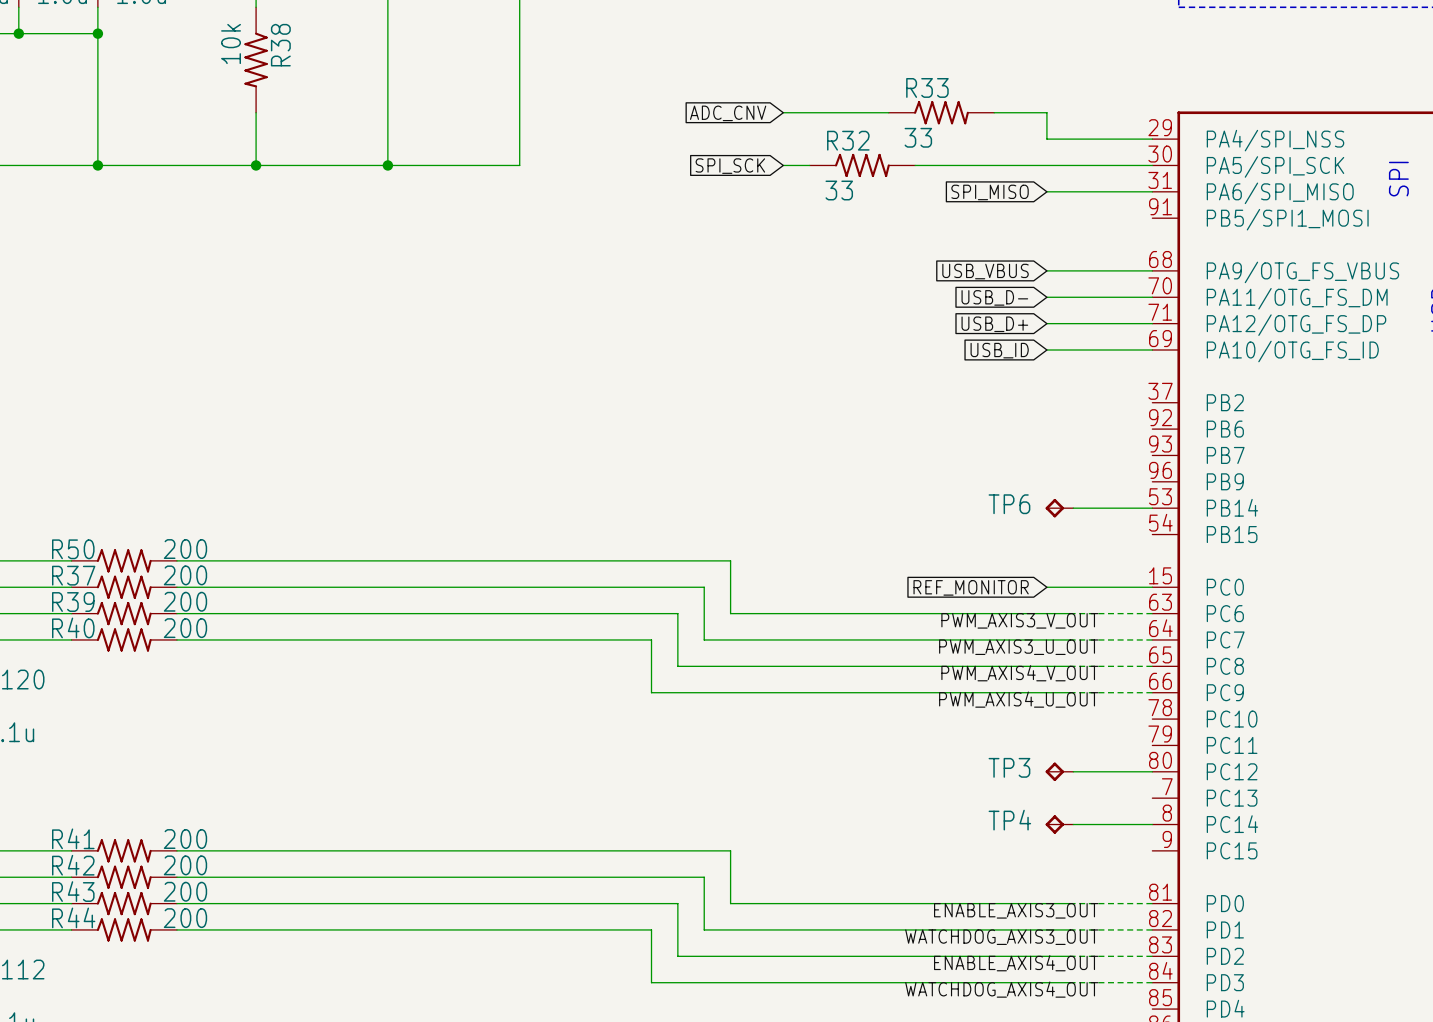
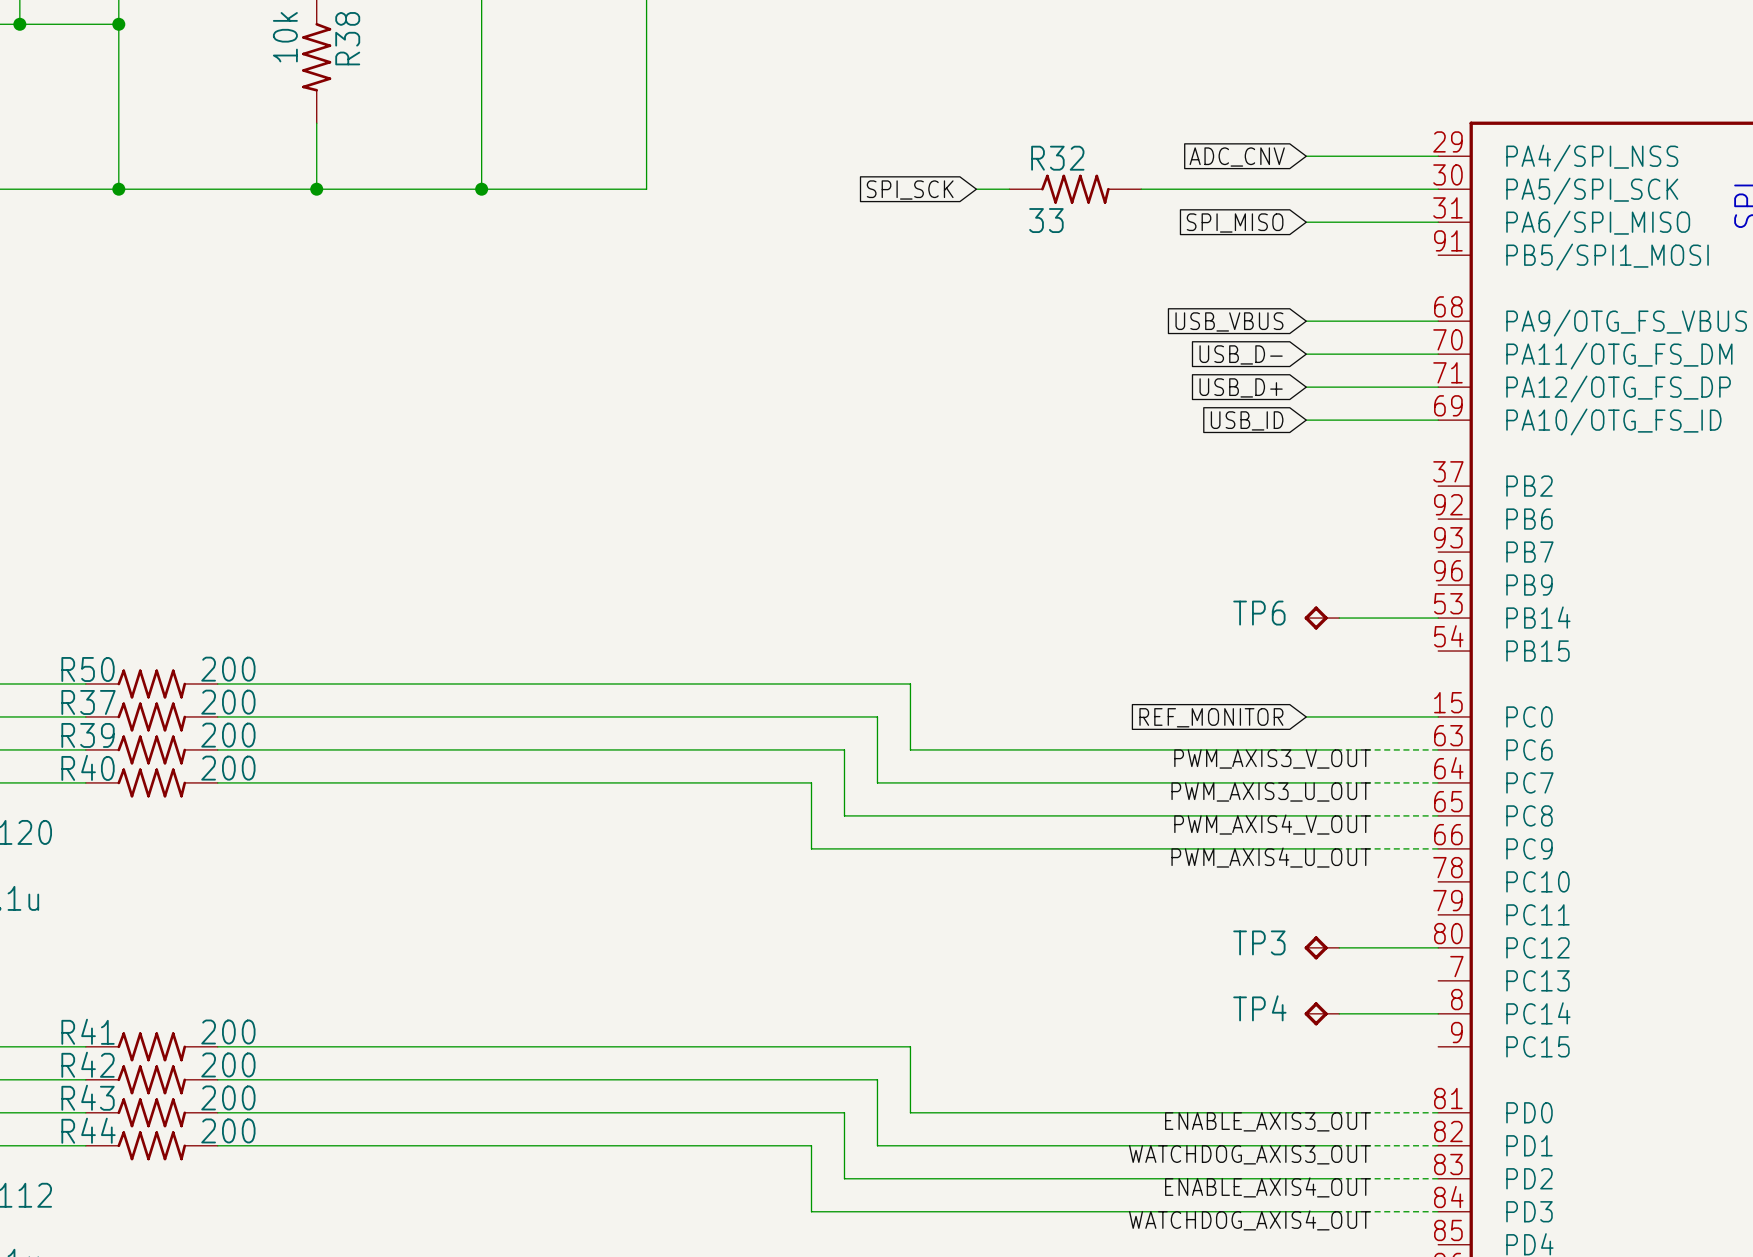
wire: (783, 112) (888, 112) -> none
R33: 33 (941, 112) -> none
wire: (994, 112) (1046, 112) (1046, 139) -> none
global label: ADC_CNV (728, 113) -> none
global label: none -> ADC_CNV (1237, 157)

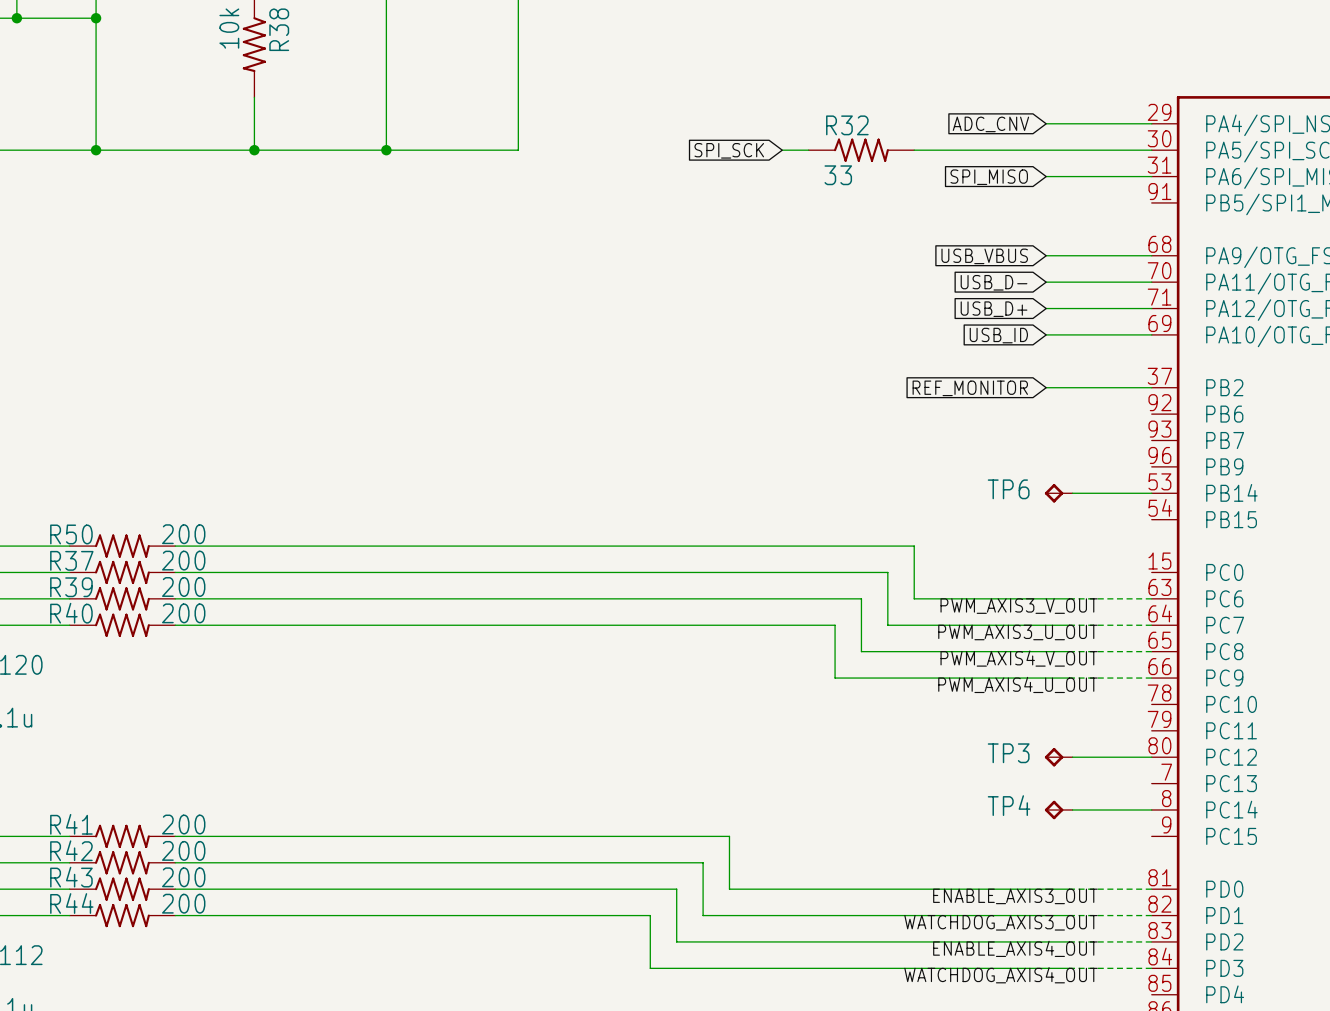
wire: (910, 683) (910, 749) -> (676, 598) (729, 598)
wire: none -> (729, 546) (914, 546) (914, 598)
wire: (877, 716) (877, 782) -> (650, 625) (703, 625)
wire: none -> (703, 572) (887, 572) (887, 625)
wire: (1306, 716) (1438, 716) -> (1046, 387) (1151, 387)
global label position: REF_MONITOR (1211, 717) -> REF_MONITOR (970, 388)
wire: (844, 749) (844, 815) (1075, 815) -> none
wire: (1075, 749) (1141, 749) -> (861, 598) (861, 651)
wire: (811, 782) (811, 848) (1042, 848) -> none
wire: (1042, 782) (1108, 782) -> (835, 625) (835, 678)

